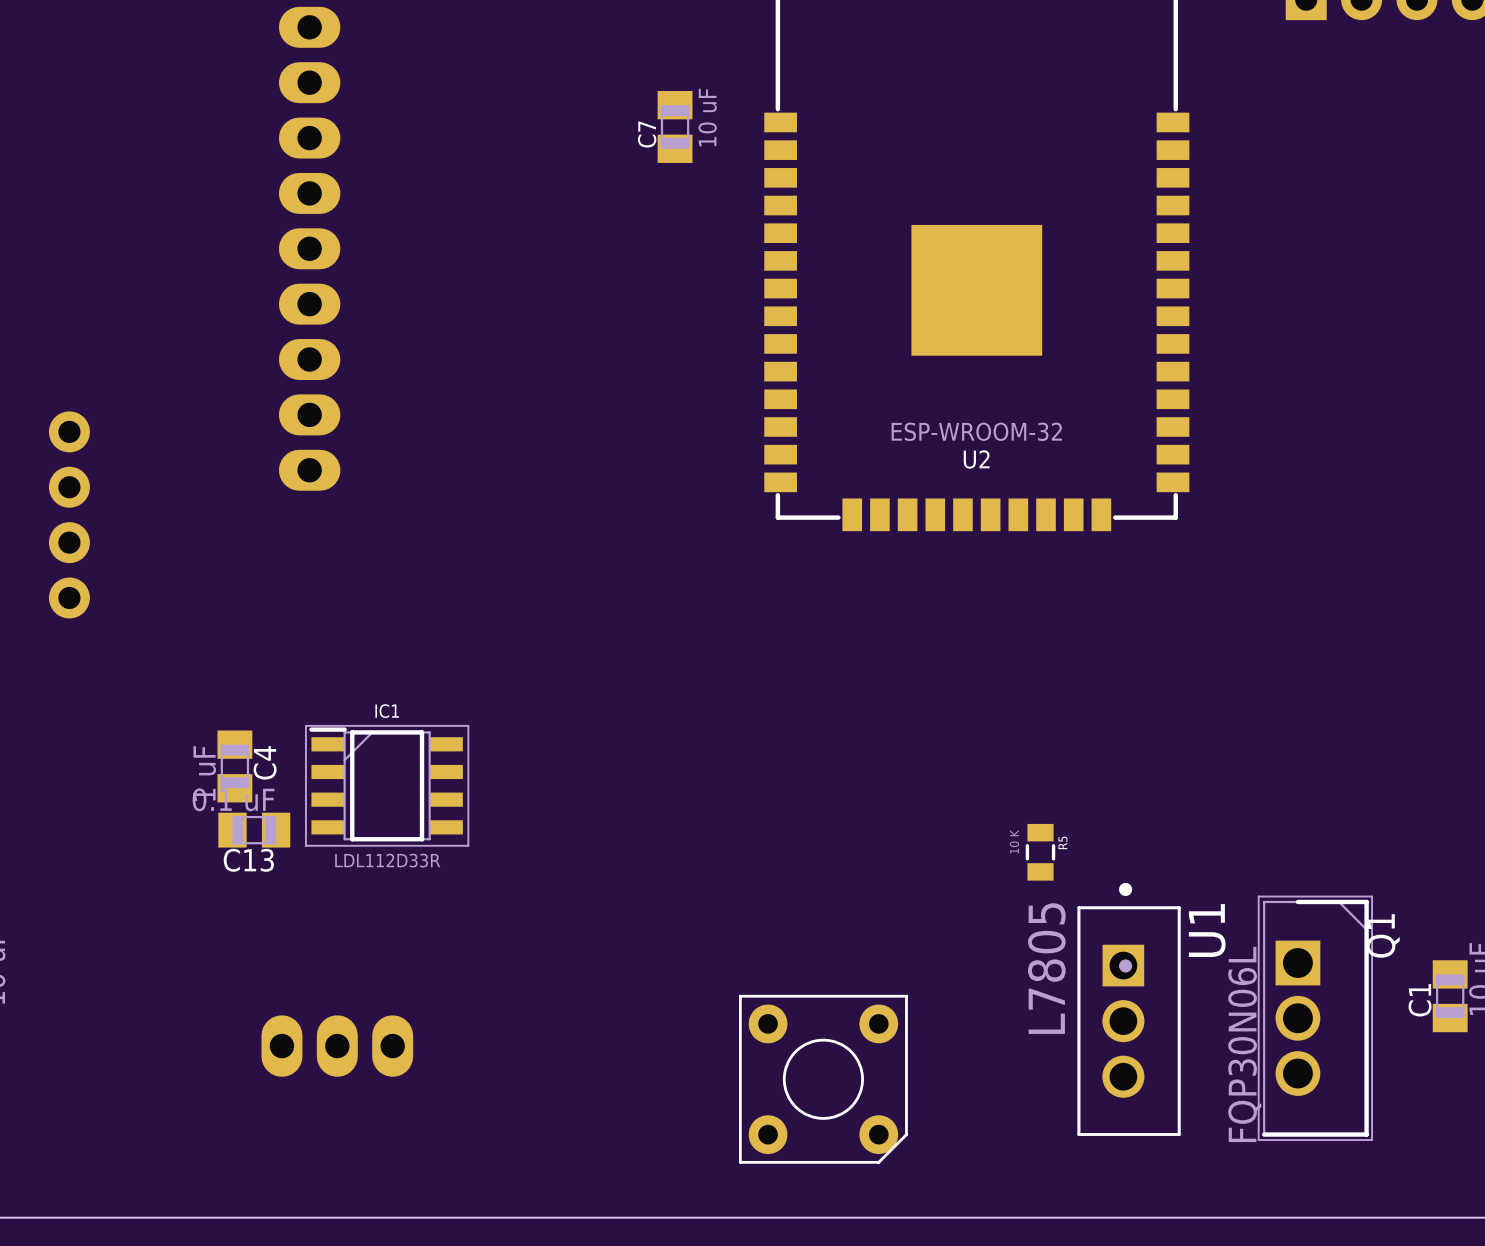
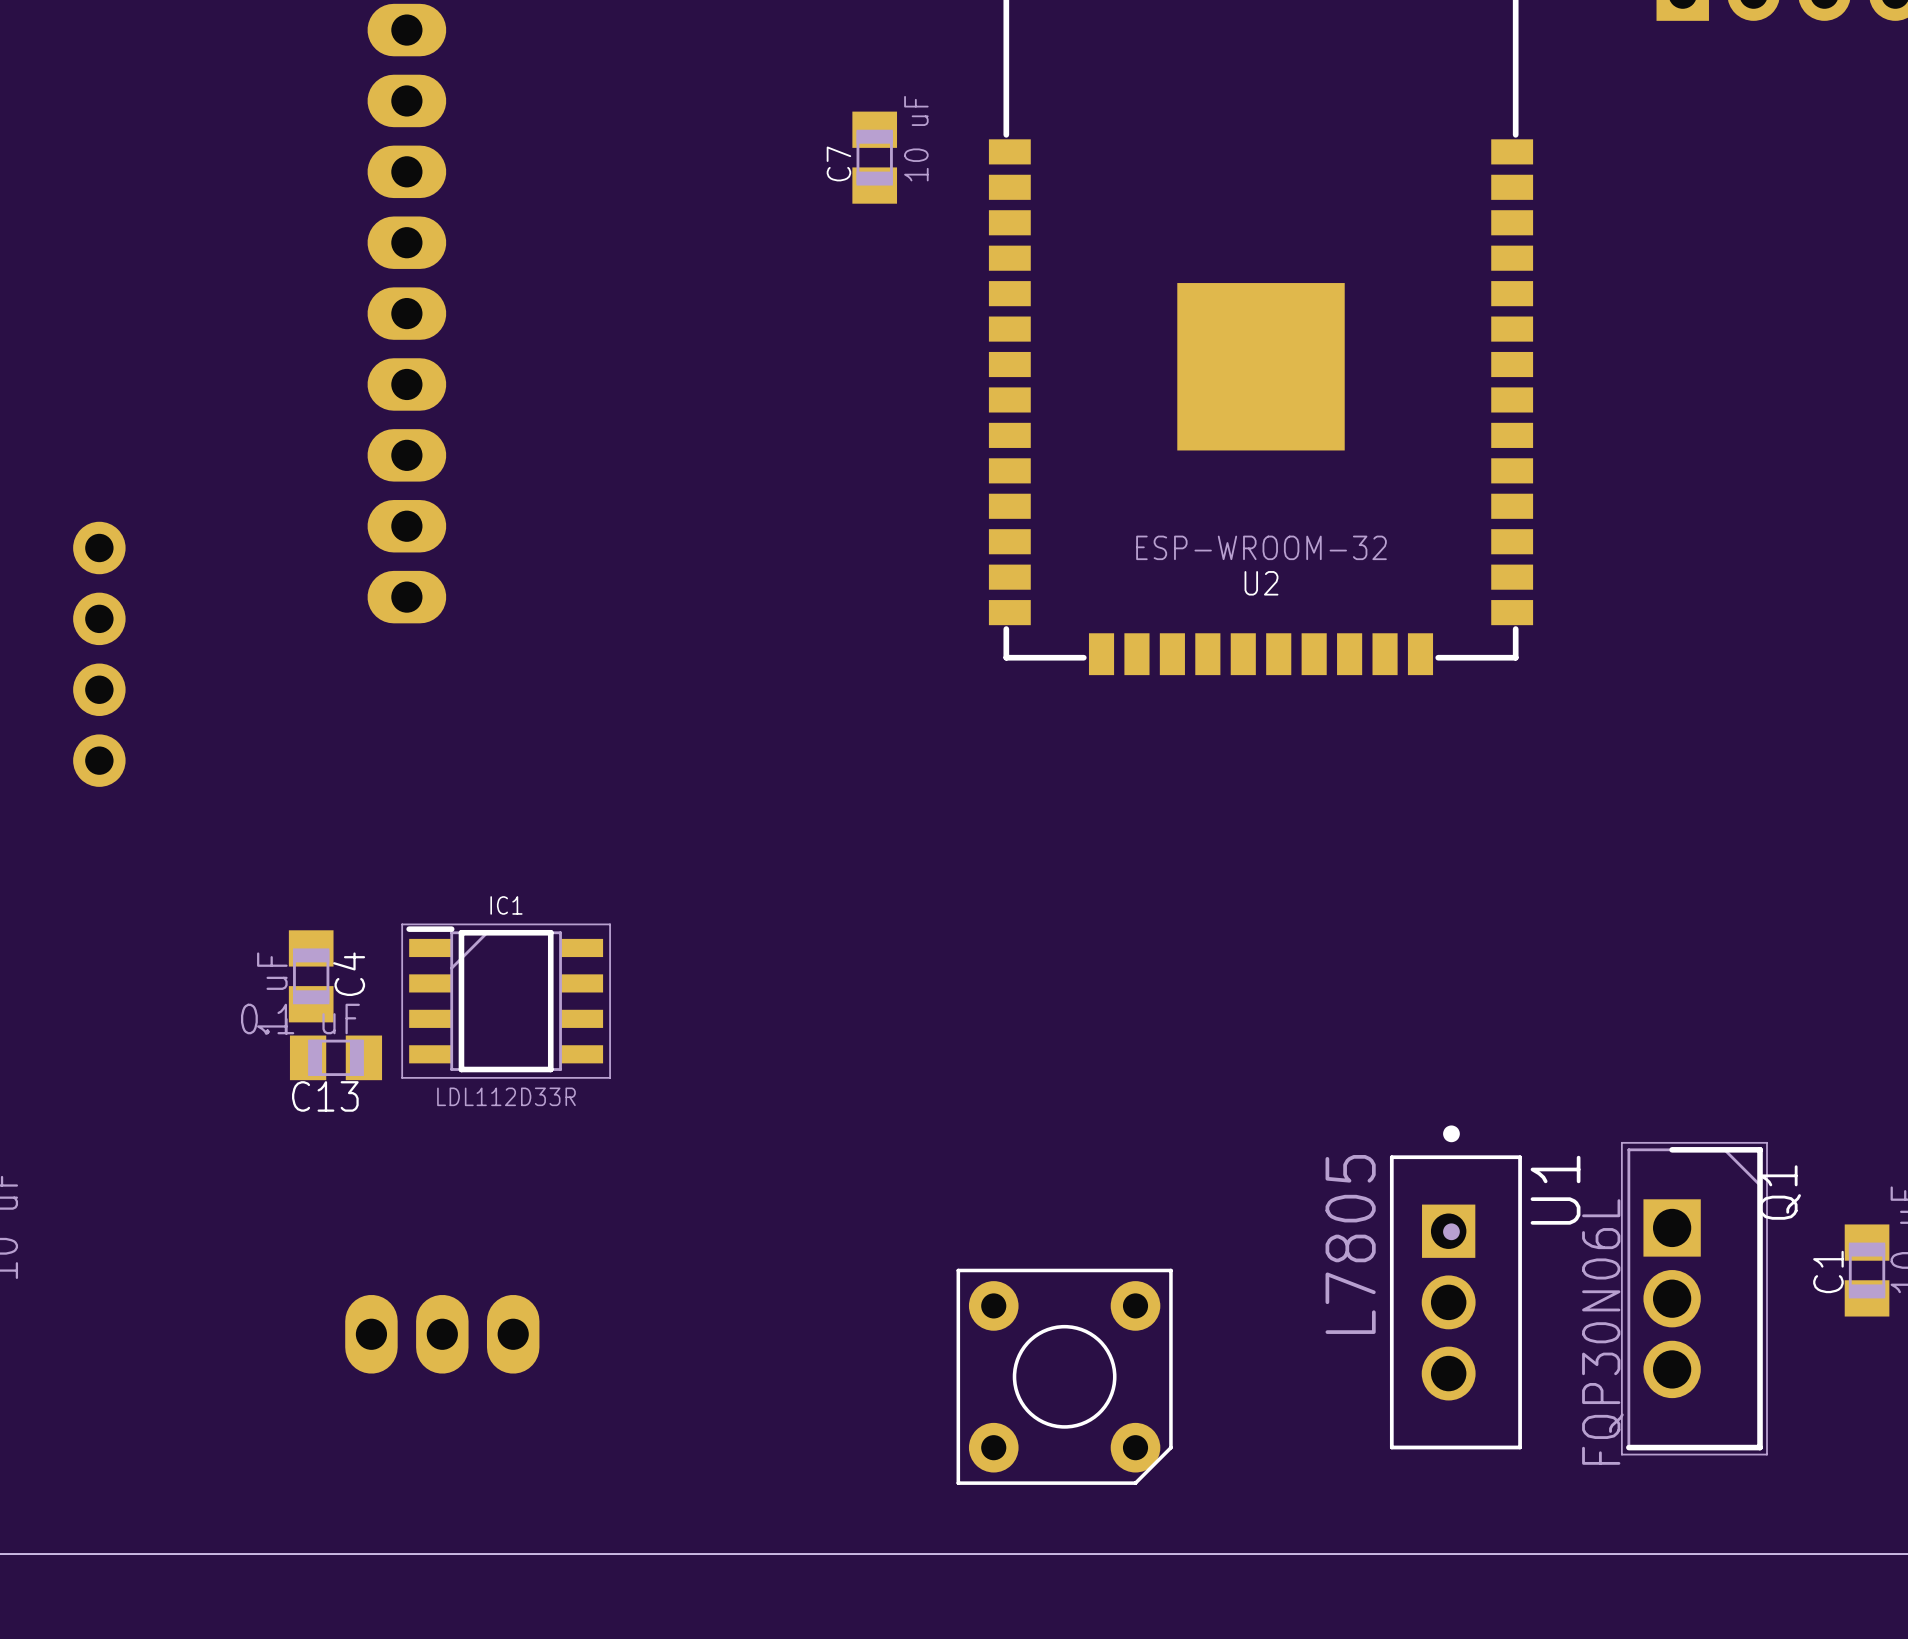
R5: 10 K (1040, 852) -> none

